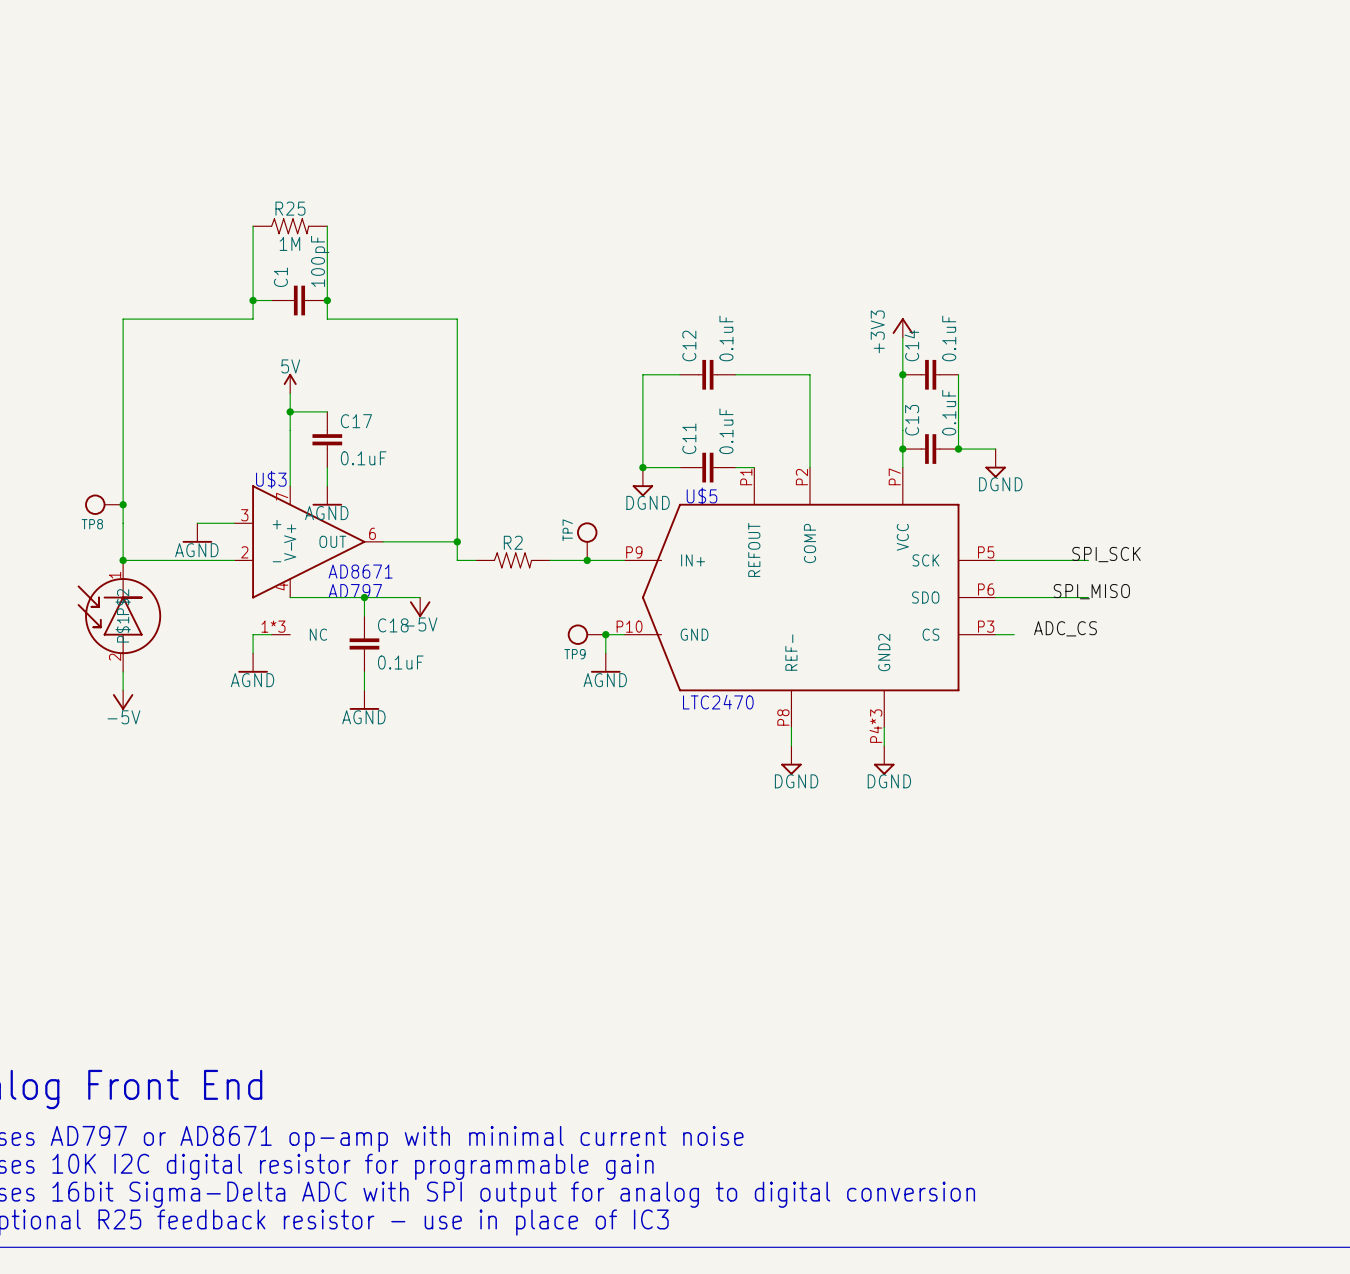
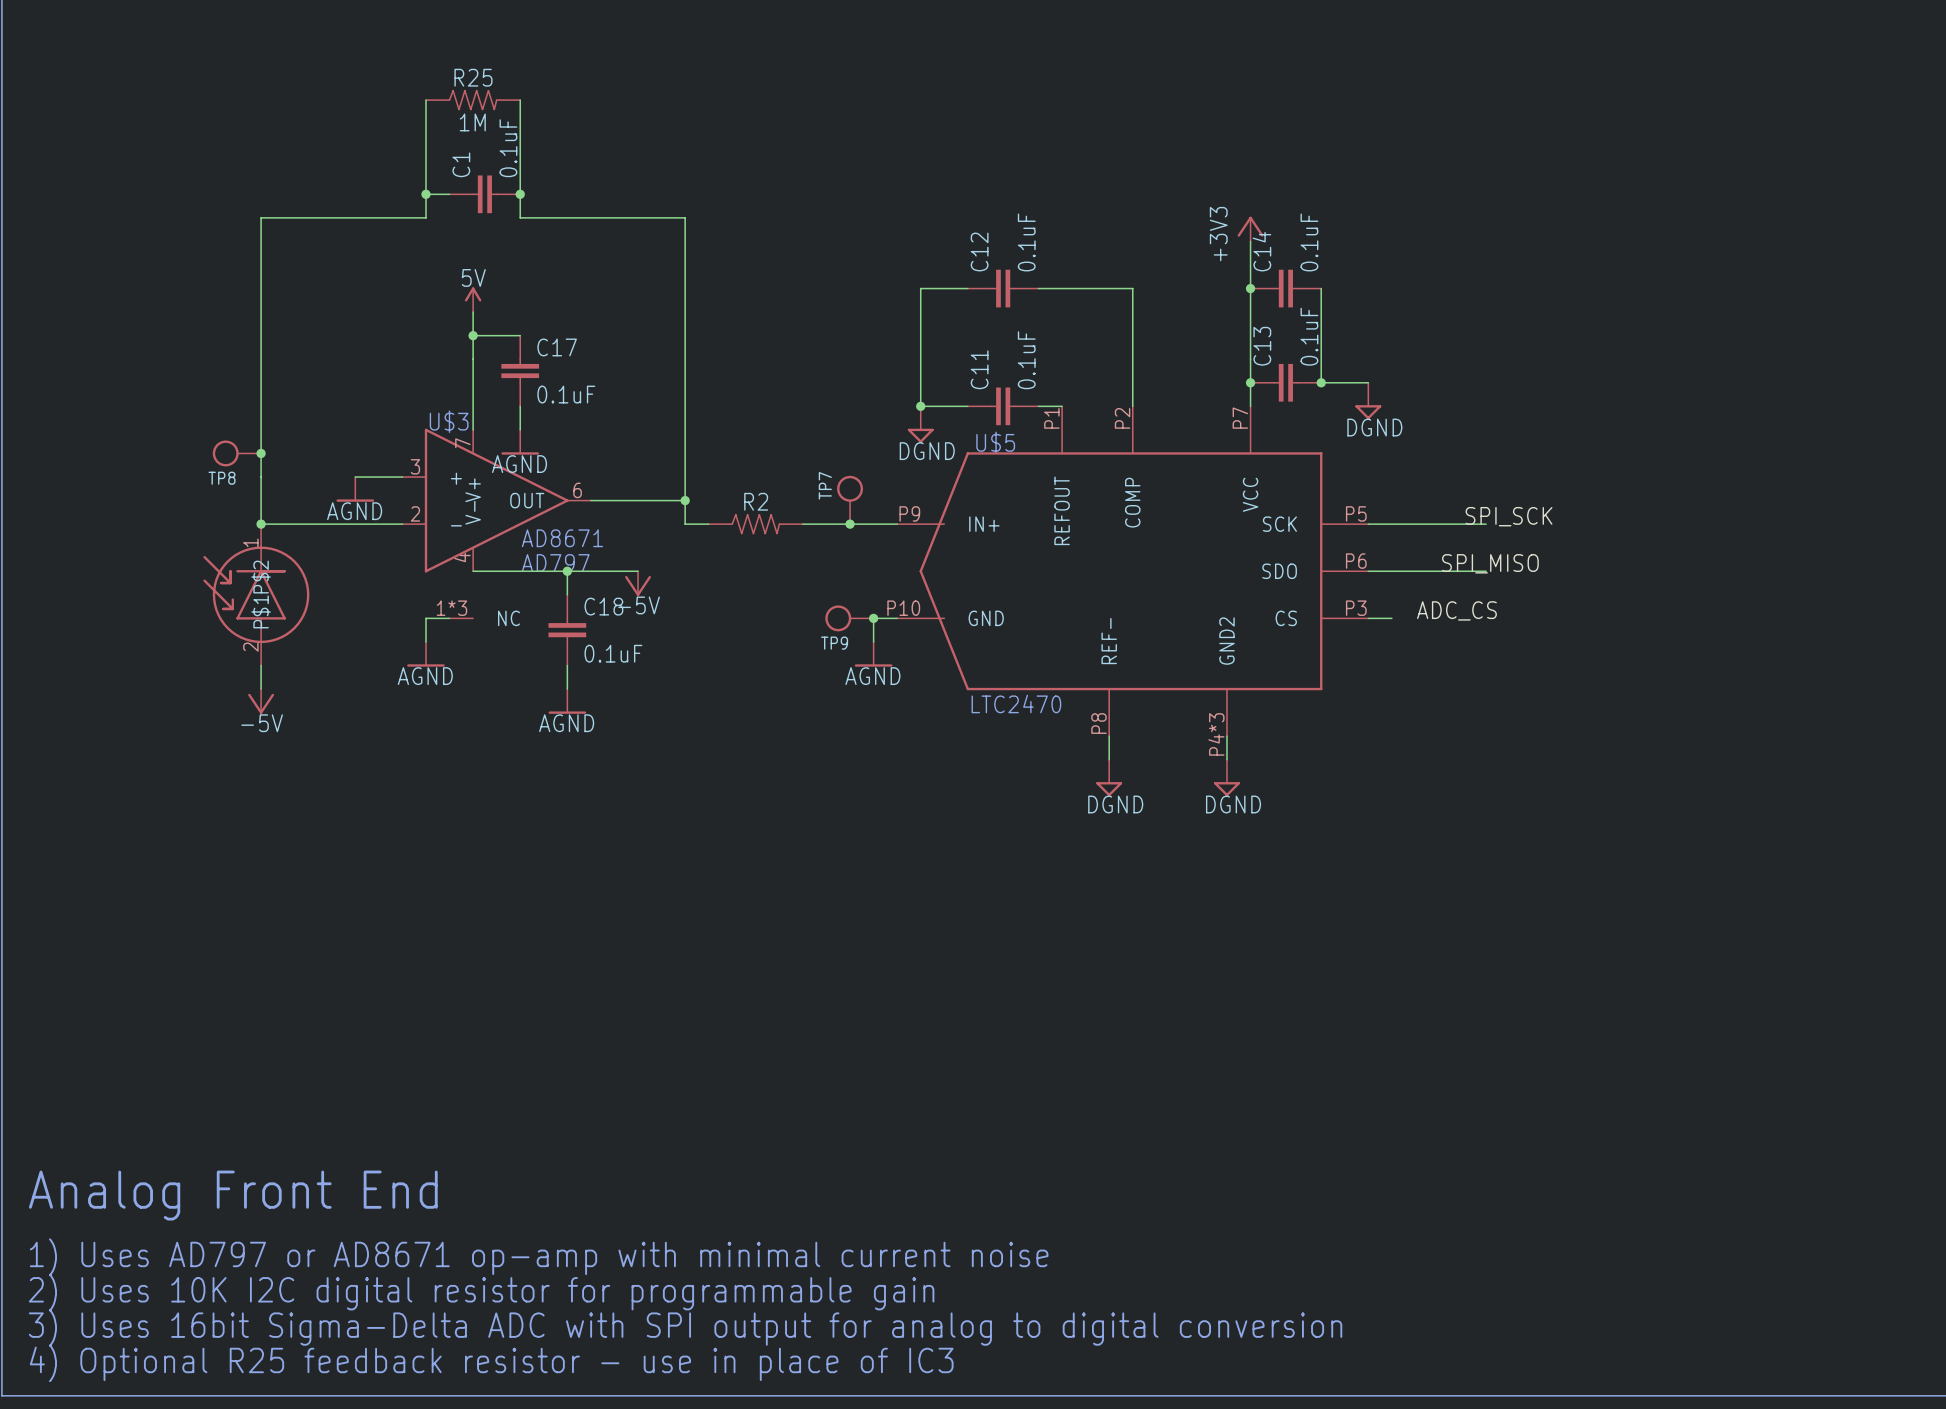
C1 value: 100pF (320, 261) -> 0.1uF (508, 148)

